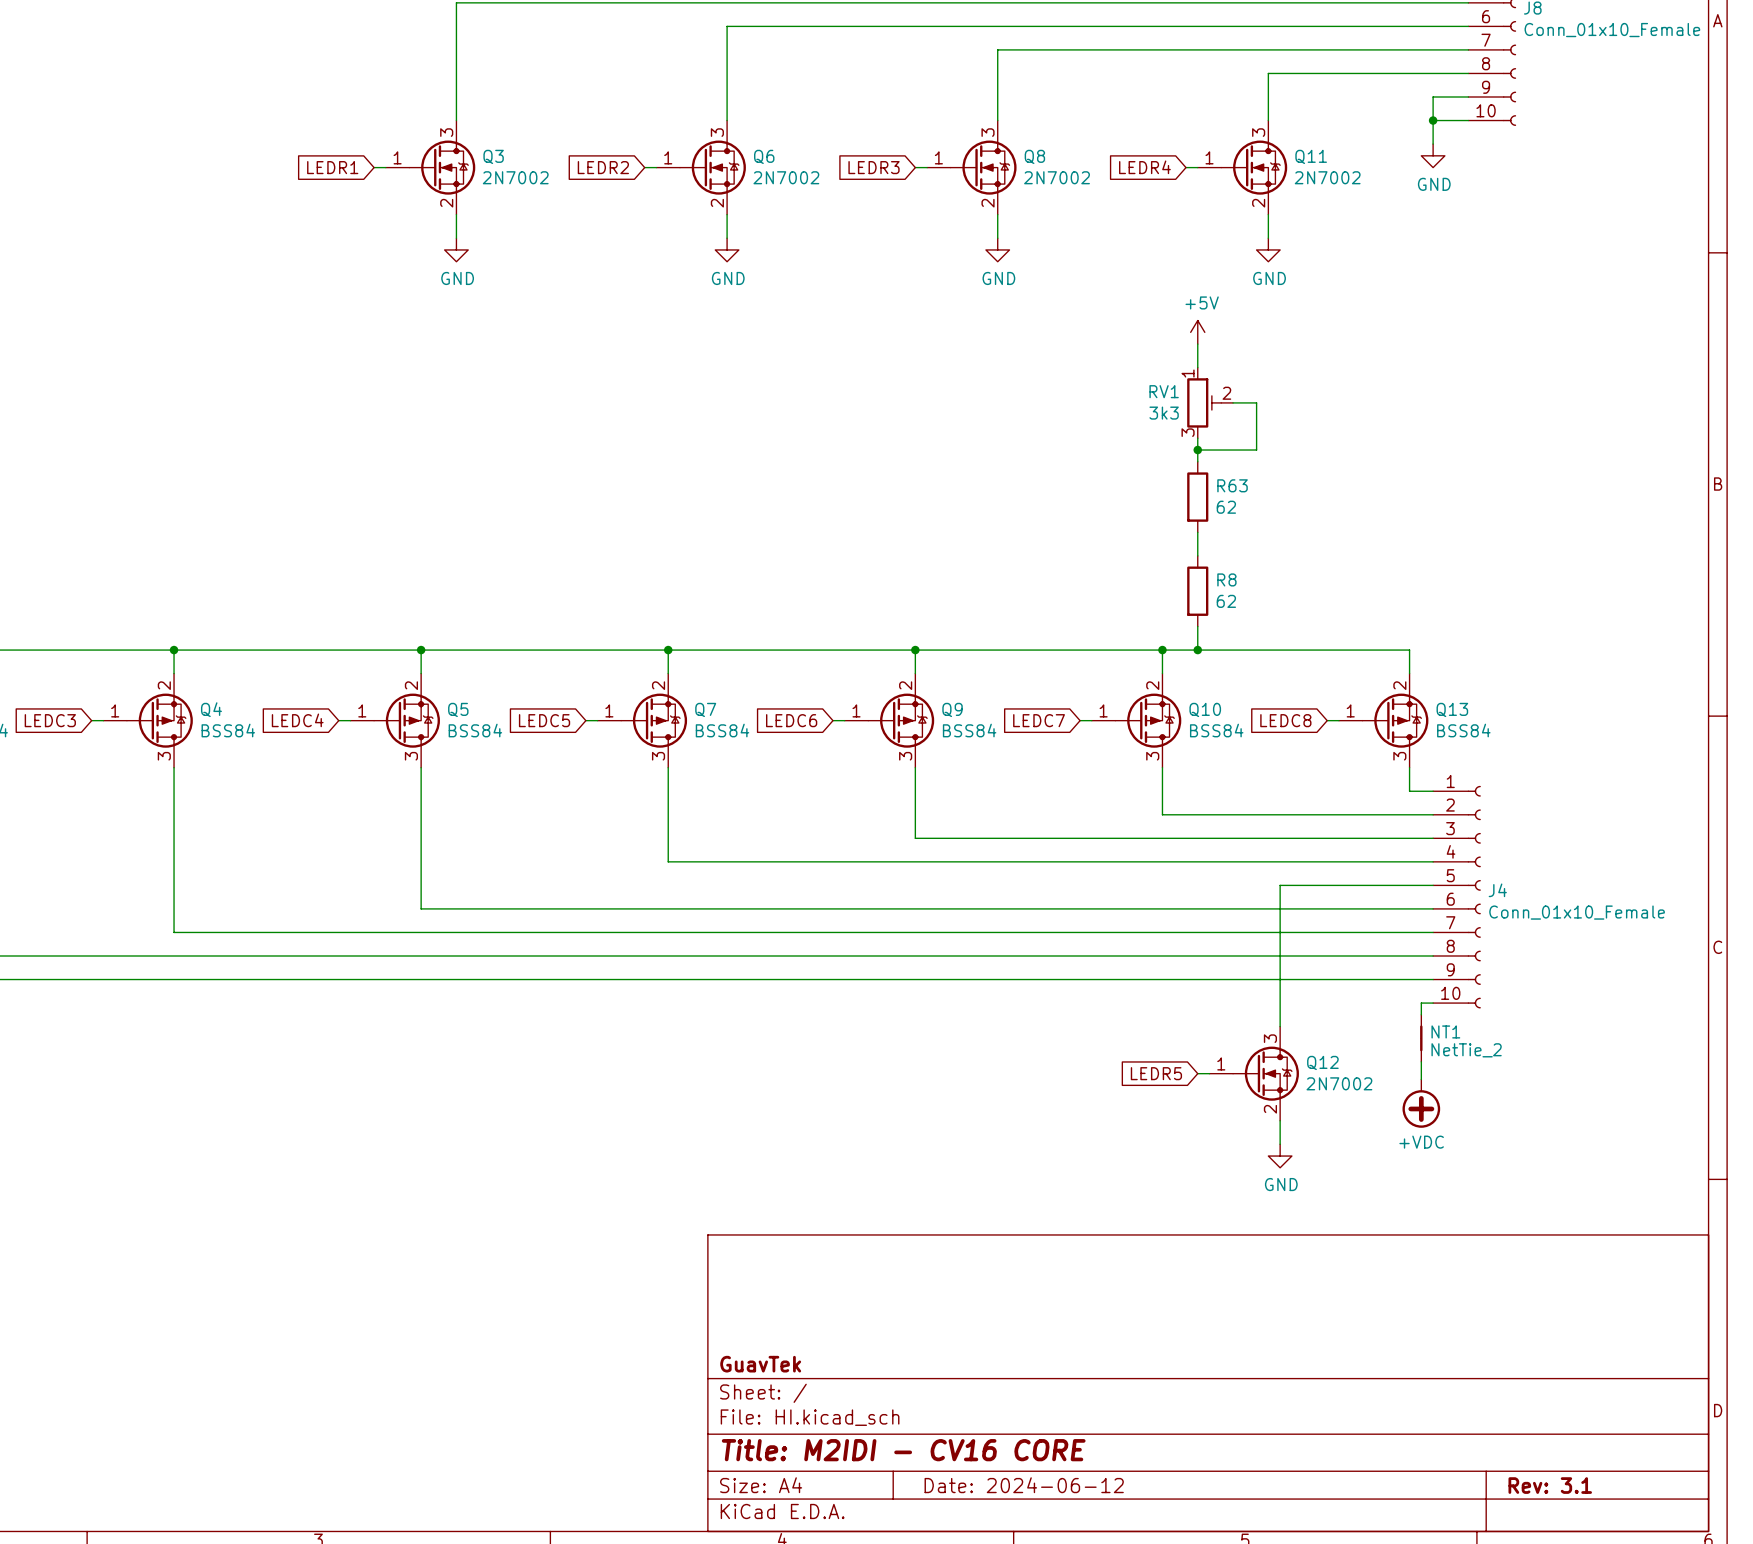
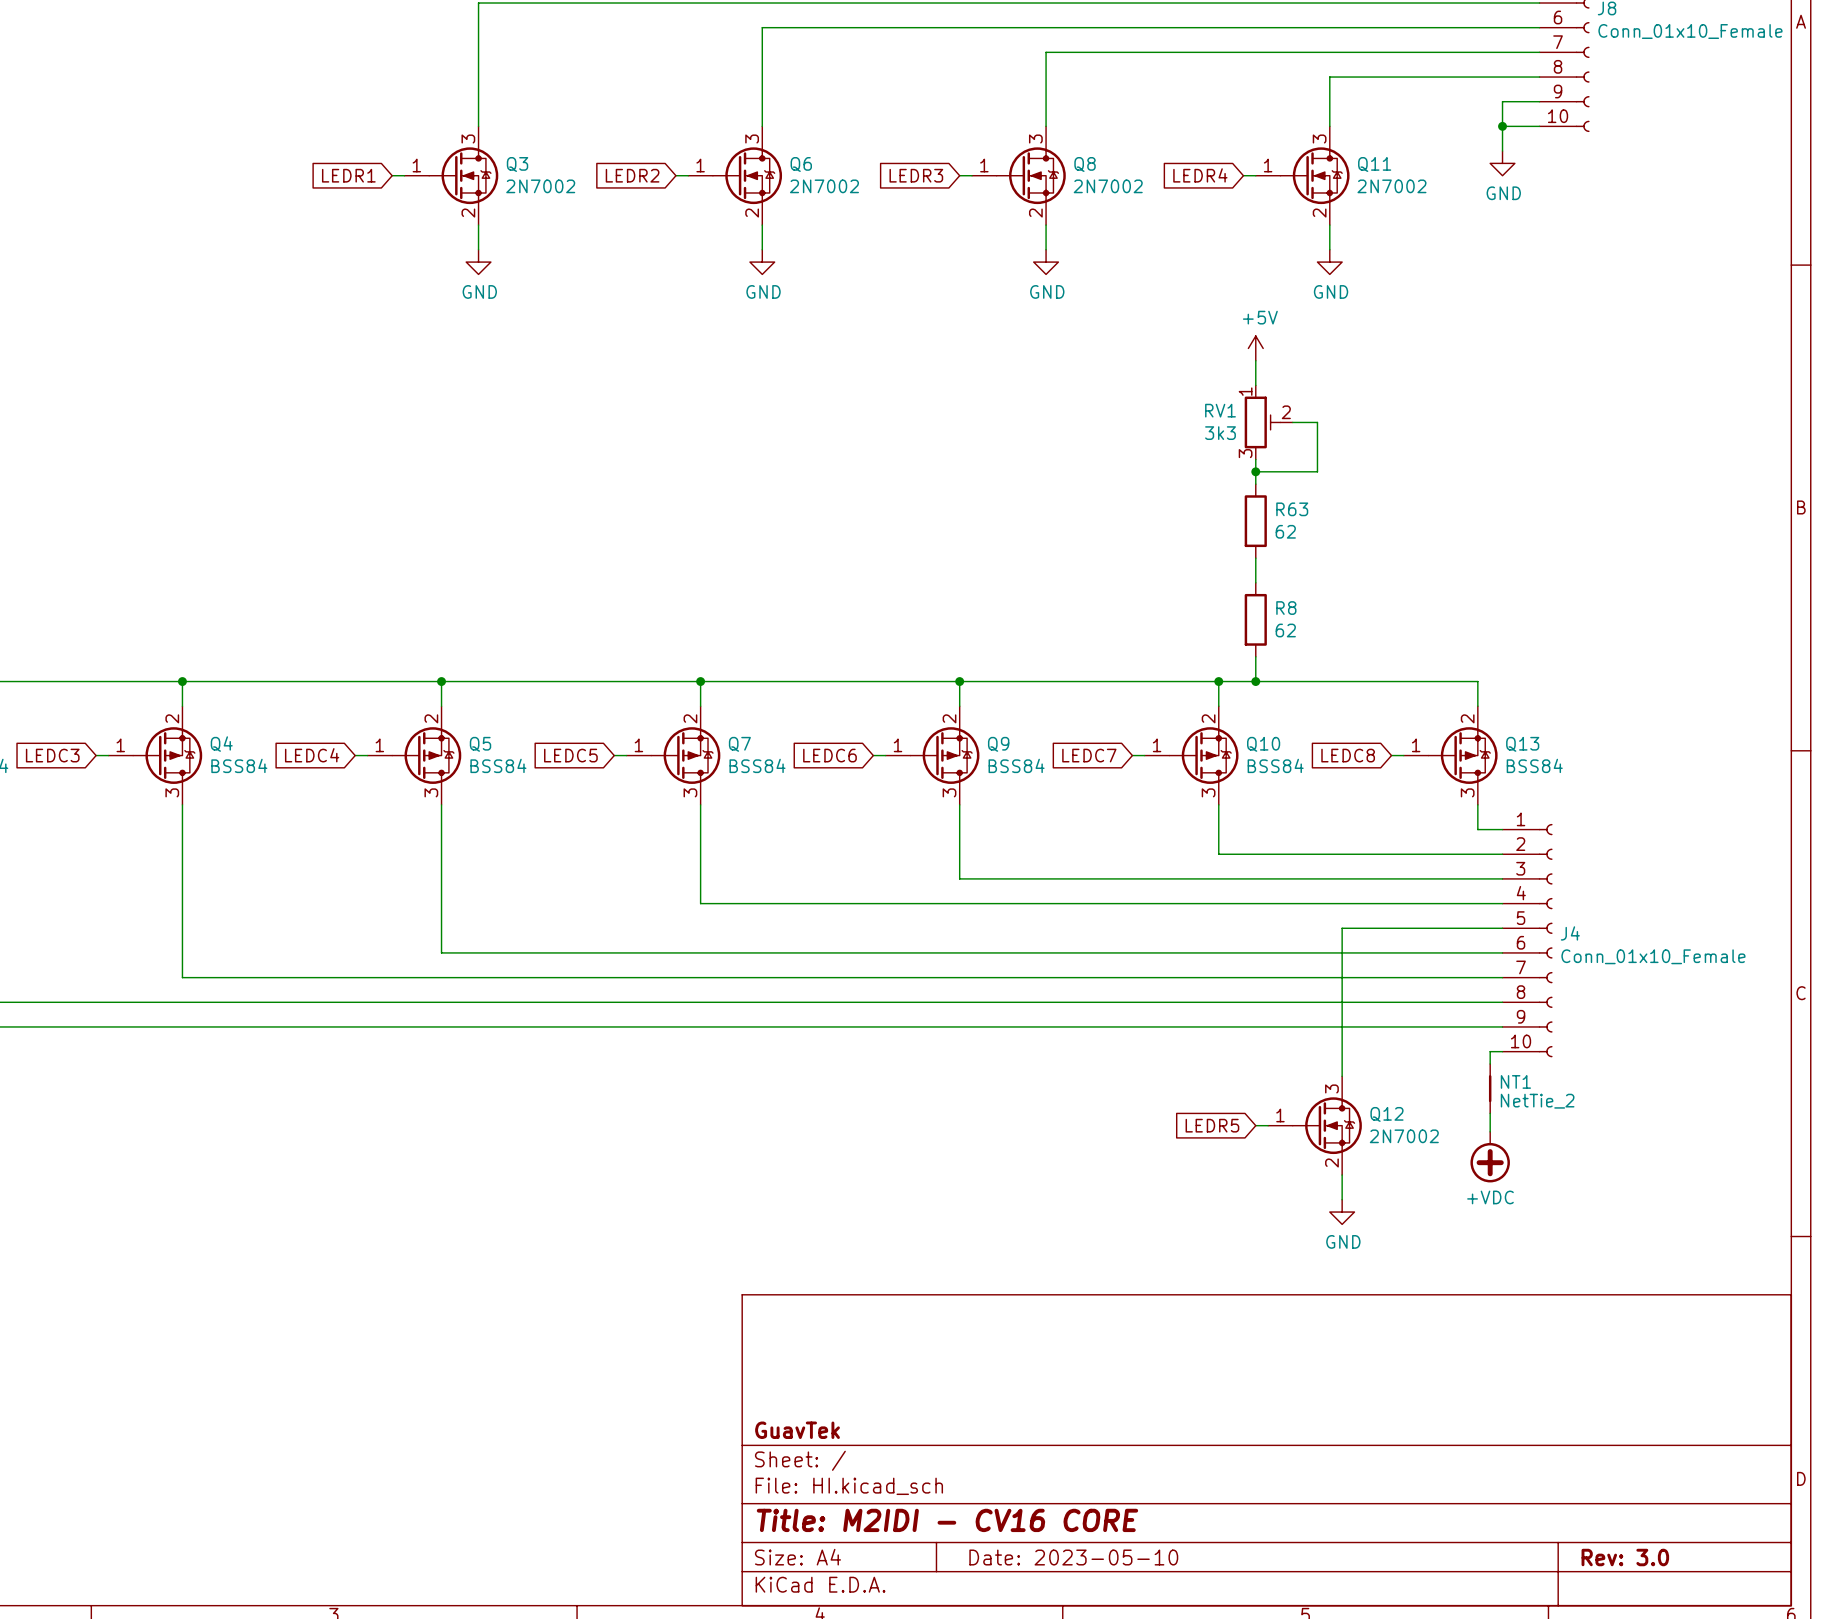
title block: Date: 2024-06-12 (1024, 1485) -> Date: 2023-05-10 (1073, 1557)
title block: Rev: 3.1 (1550, 1485) -> Rev: 3.0 (1625, 1557)

